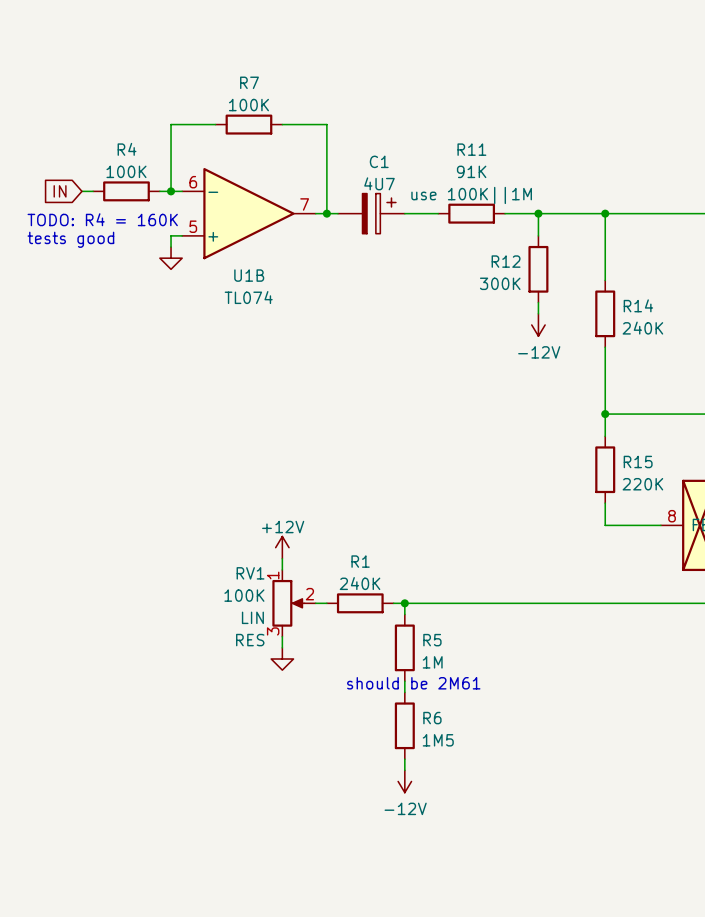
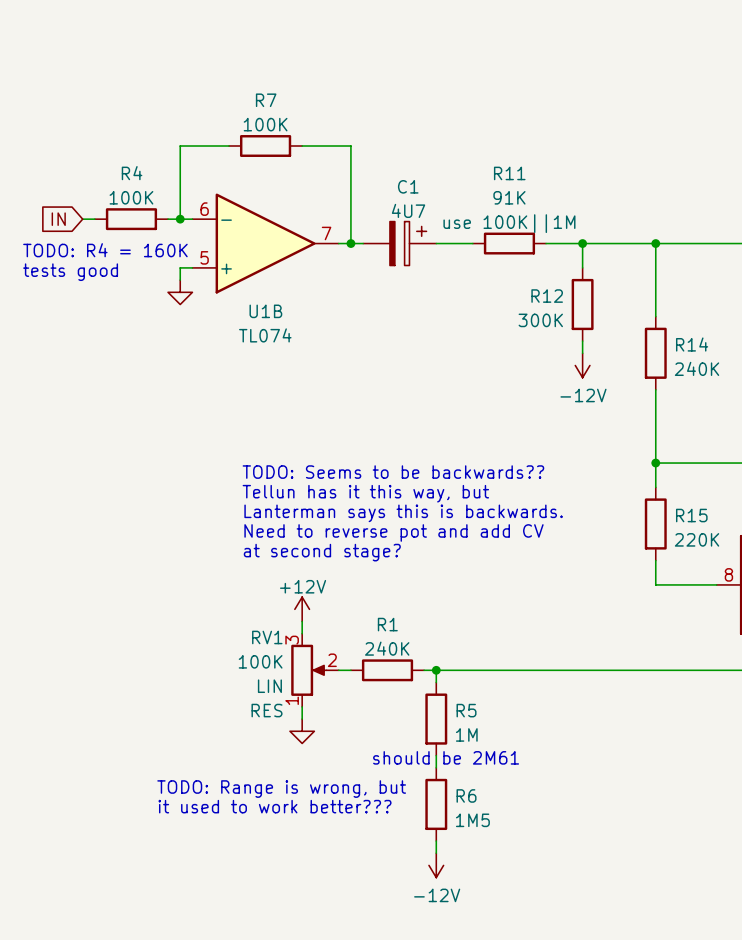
text: none -> TODO: Seems to be backwards?? (393, 472)
text: none -> Tellun has it this way, but (365, 493)
text: none -> Lanterman says this is backwards. (403, 513)
text: none -> Need to reverse pot and add CV (394, 532)
text: none -> at second stage? (322, 552)
RV1 flip: as is (288, 603) -> up-down (308, 670)
text: none -> TODO: Range is wrong, but (281, 789)
text: none -> it used to work better??? (274, 806)

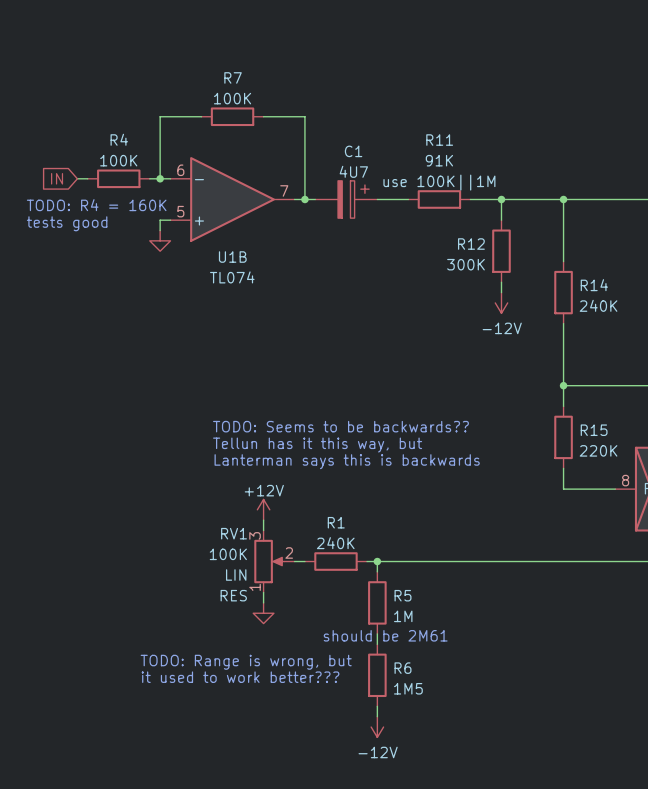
text: TODO: Seems to be backwards?? (393, 472) -> none
text: Tellun has it this way, but (365, 493) -> none
text: Lanterman says this is backwards. (403, 513) -> TODO: Seems to be backwards?? (340, 426)
text: Need to reverse pot and add CV (394, 532) -> Tellun has it this way, but (317, 445)
text: at second stage? (322, 552) -> Lanterman says this is backwards (347, 461)

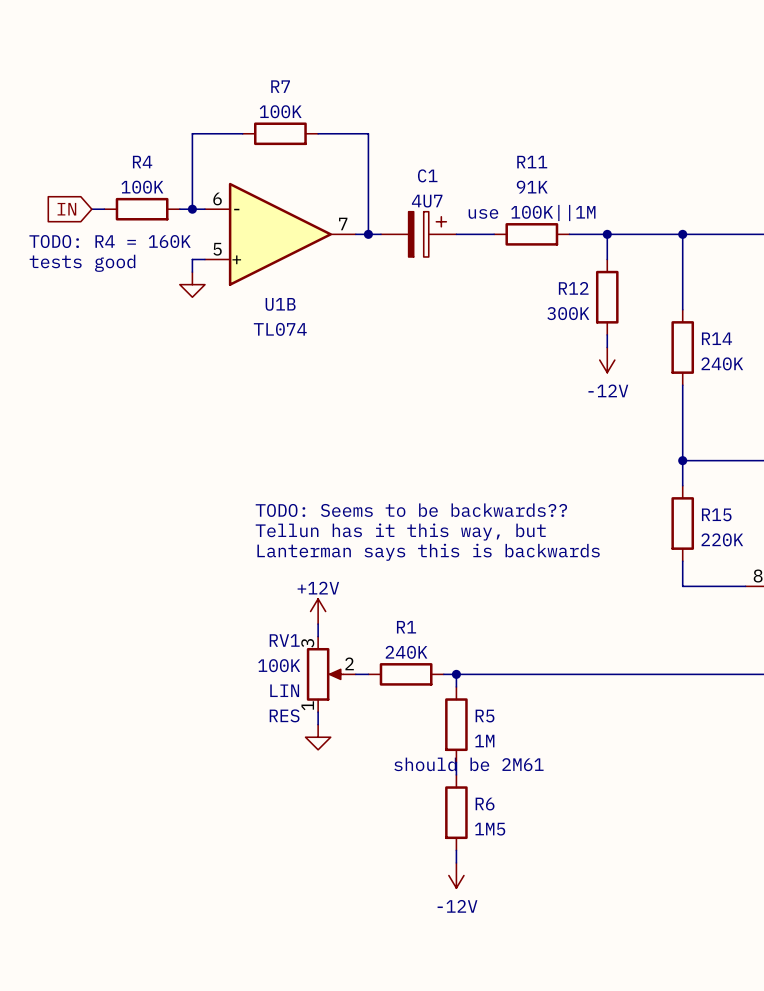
text: TODO: Range is wrong, but (246, 662) -> none
text: it used to work better??? (240, 677) -> none

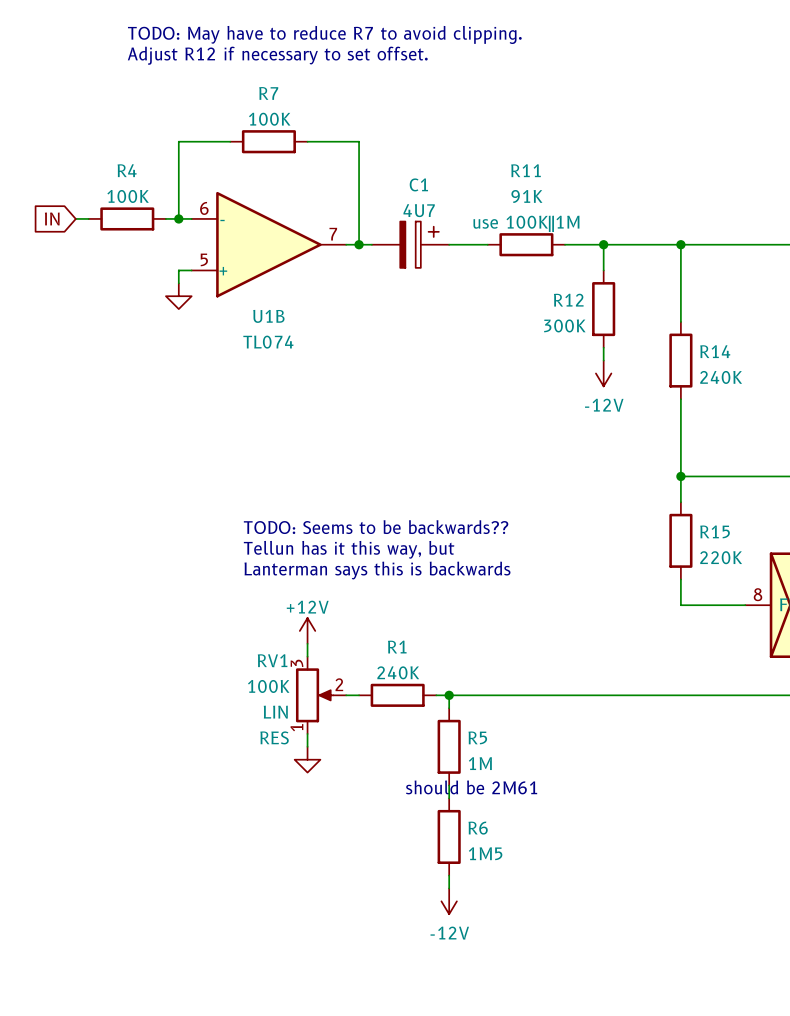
text: none -> TODO: May have to reduce R7 to avoid clipping. (324, 34)
text: none -> Adjust R12 if necessary to set offset. (277, 55)
text: TODO: R4 = 160K (110, 241) -> none
text: tests good (82, 263) -> none

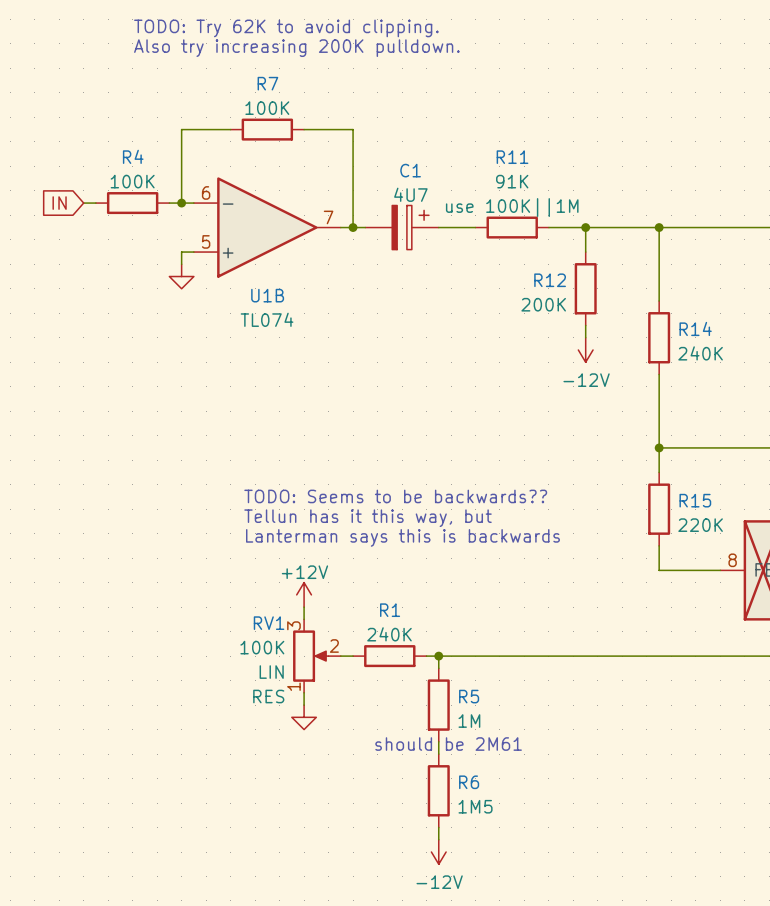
text: TODO: May have to reduce R7 to avoid clipping. (324, 34) -> TODO: Try 62K to avoid clipping. (286, 28)
text: Adjust R12 if necessary to set offset. (277, 55) -> Also try increasing 200K pulldown. (296, 48)
R12 value: 300K (564, 325) -> 200K (543, 304)

